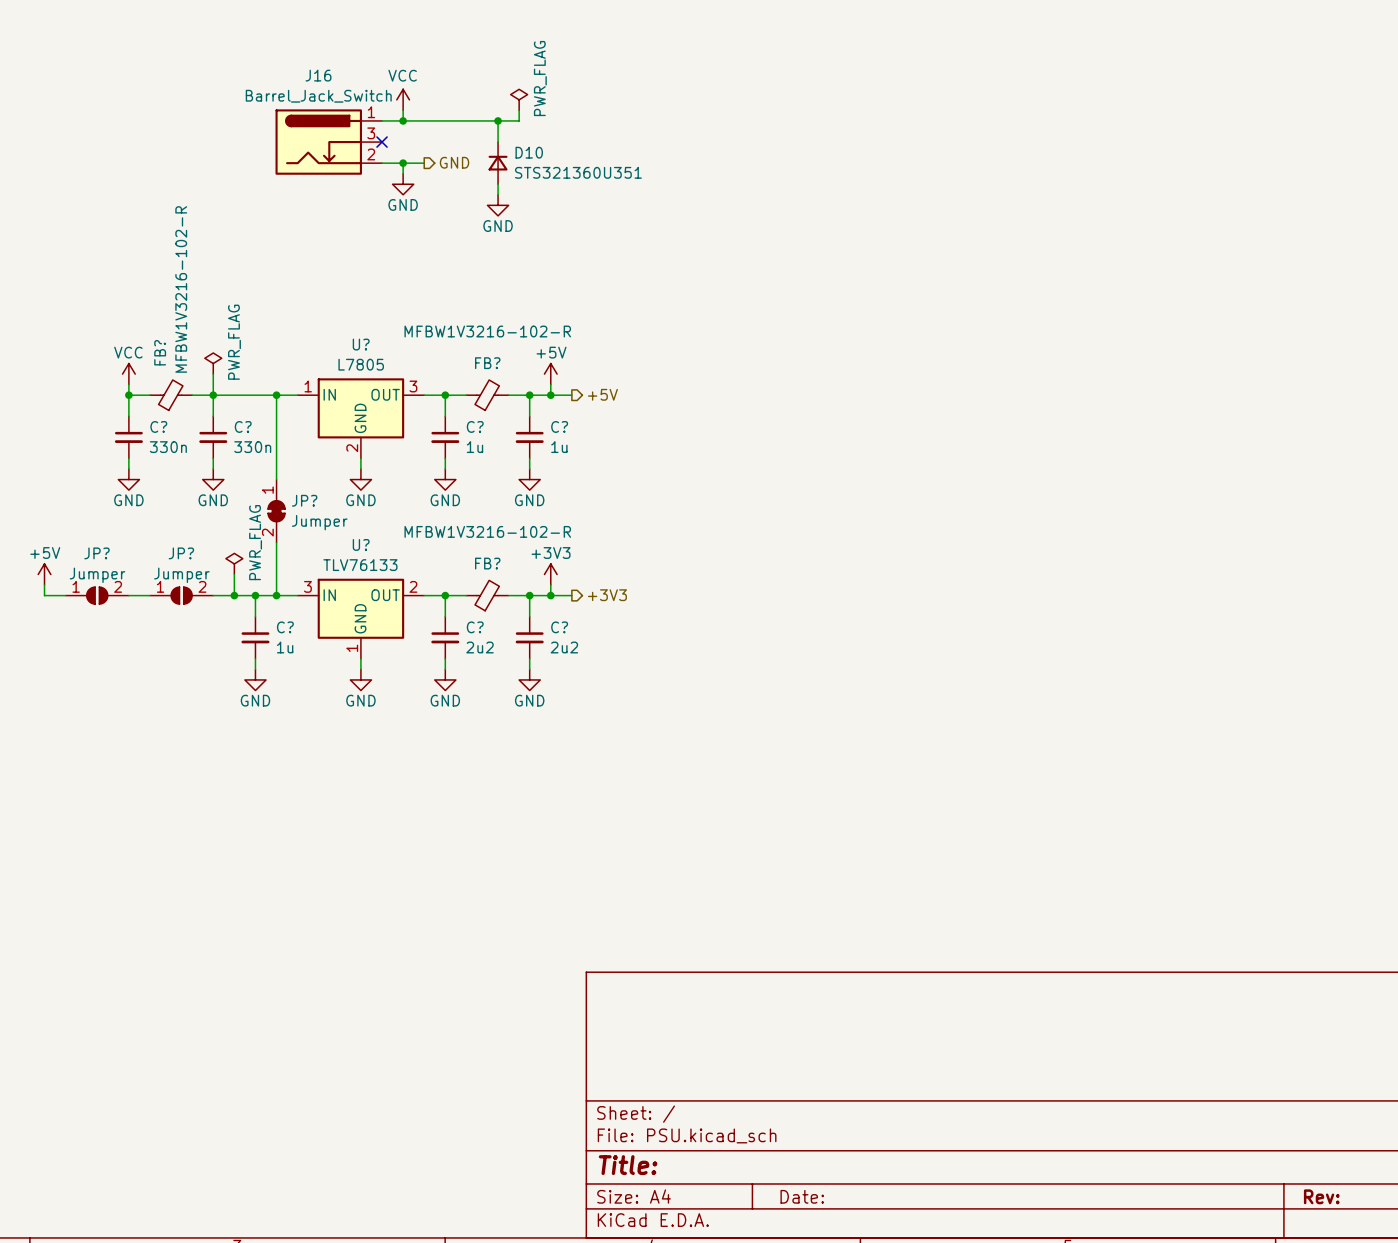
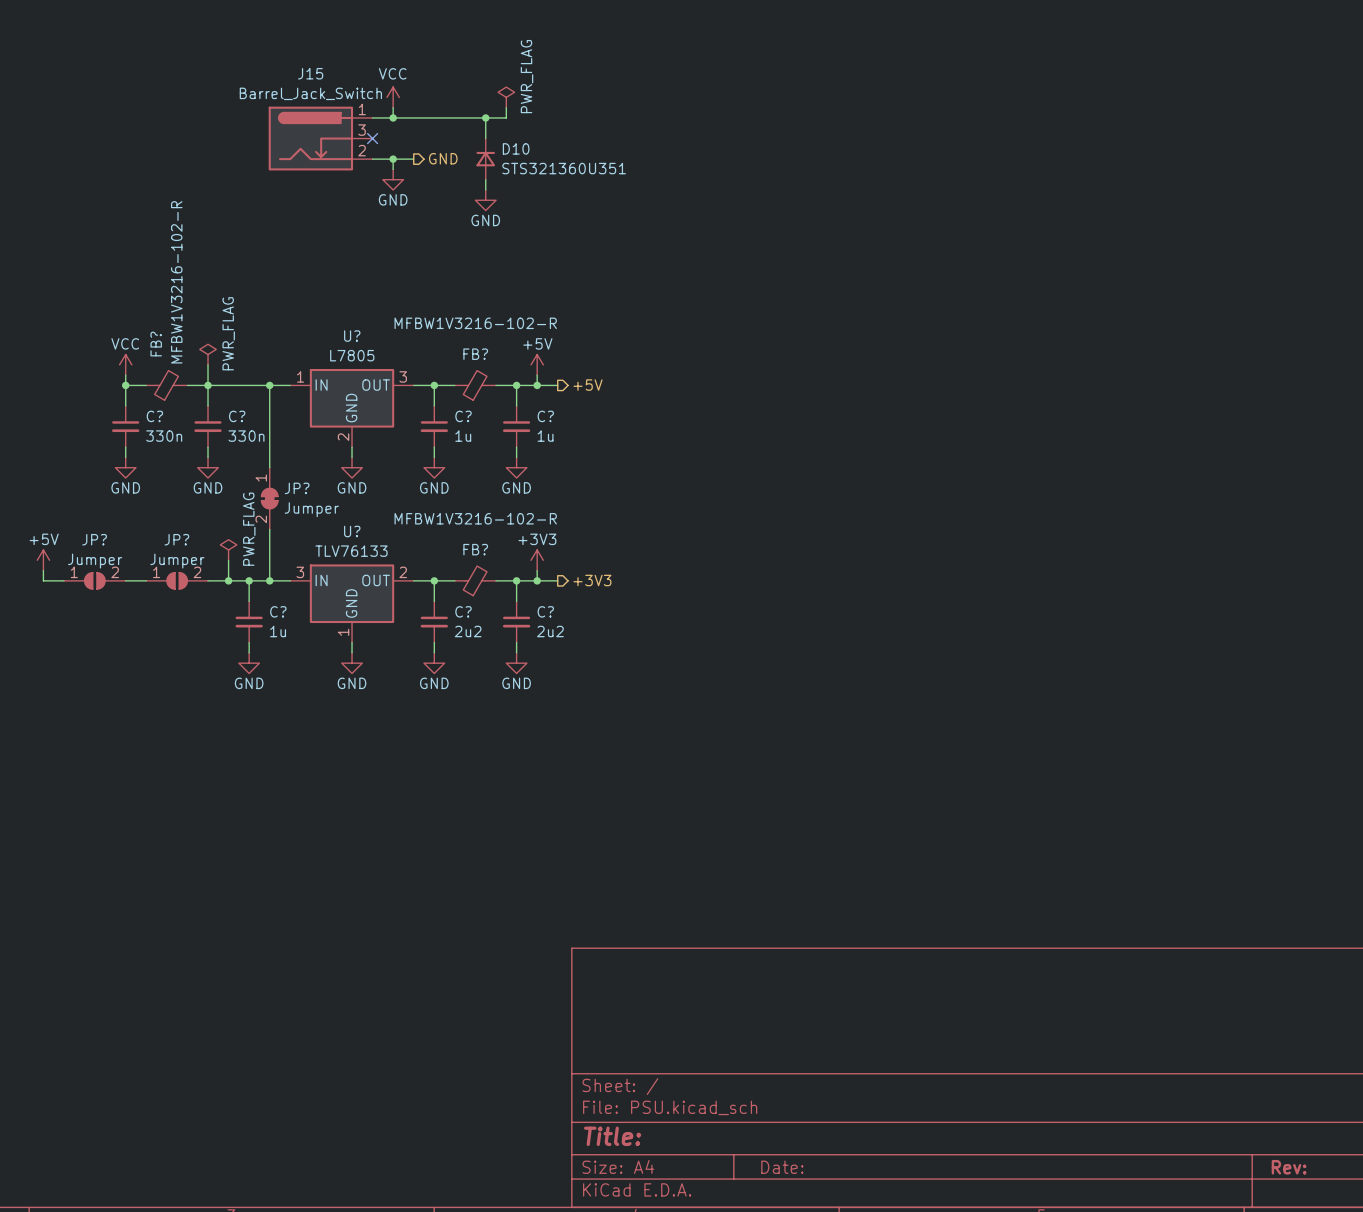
J16 name: J16 (318, 75) -> J15 (310, 73)

